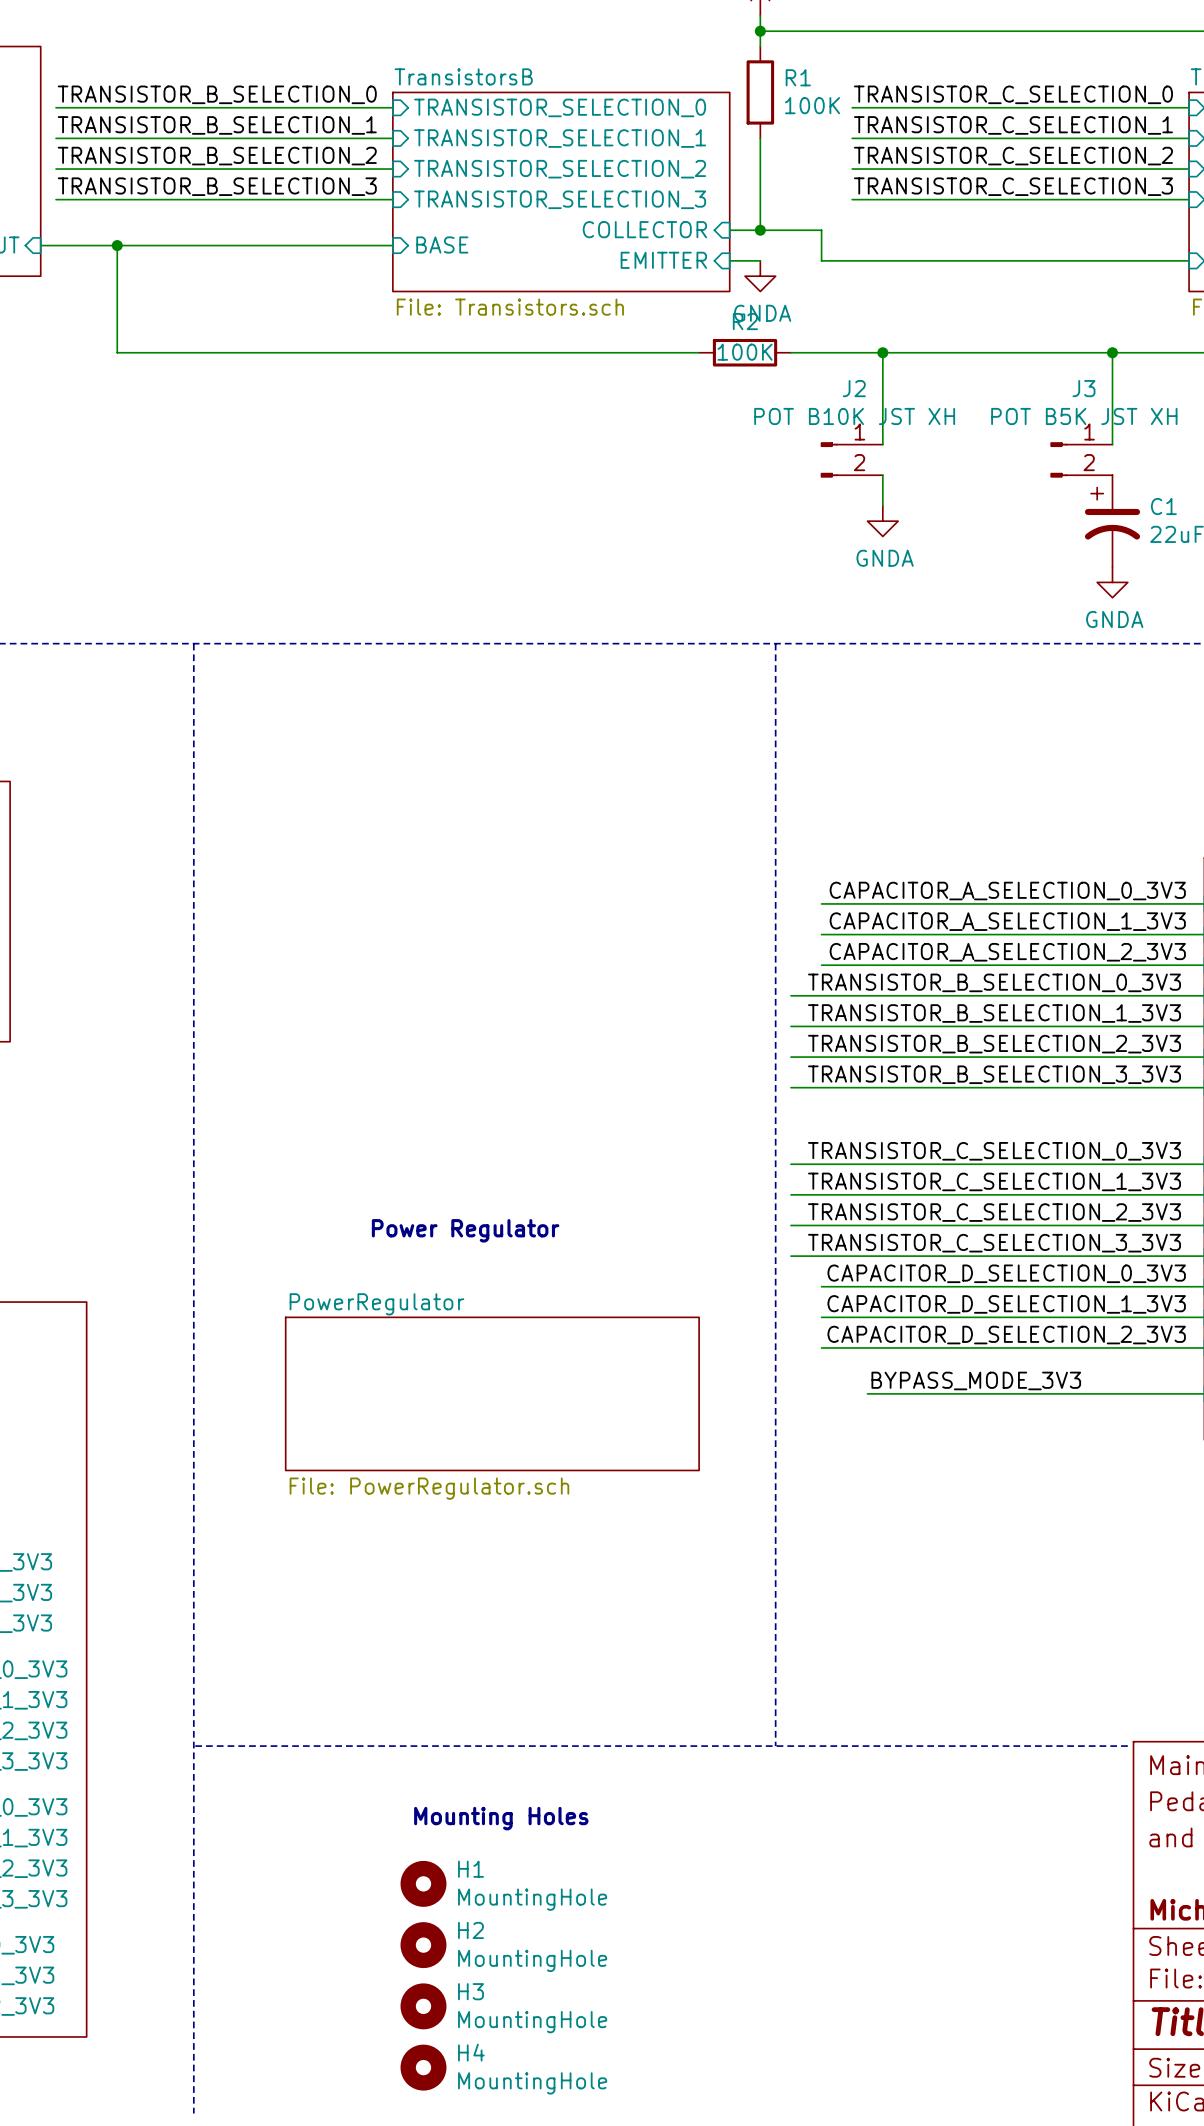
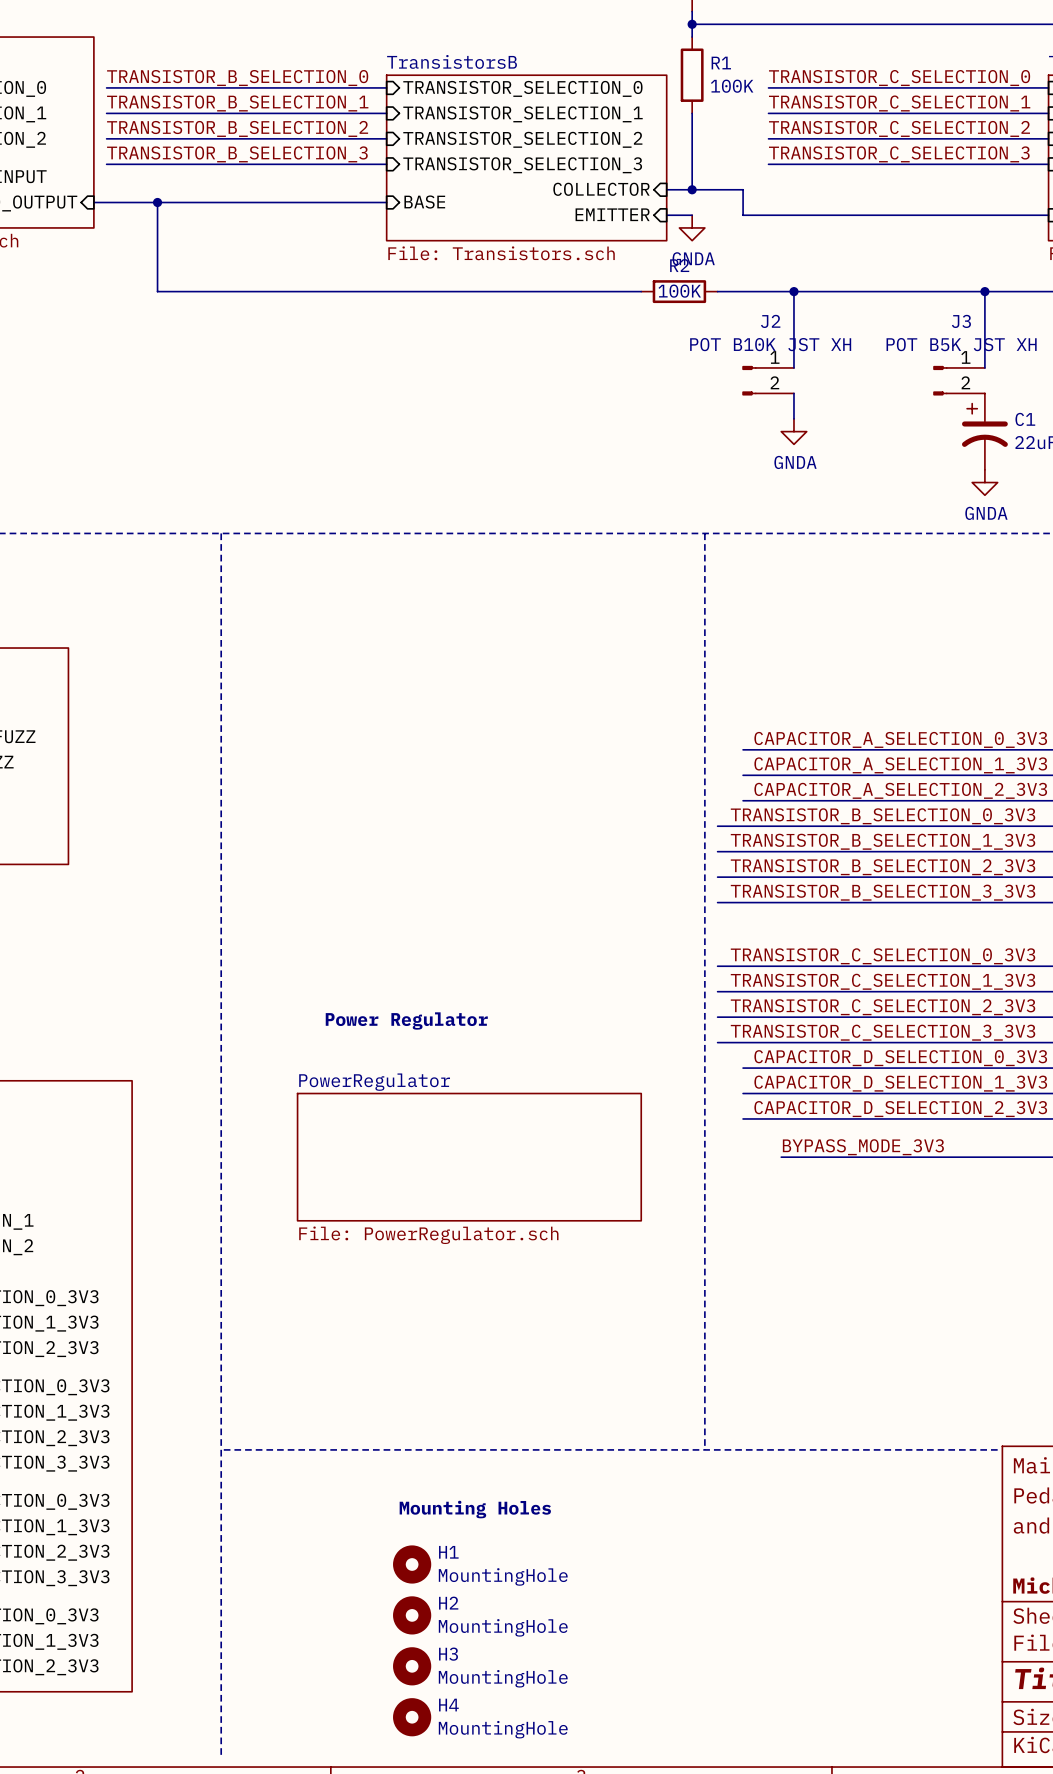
text position: Power Regulator (465, 1230) -> Power Regulator (406, 1021)

